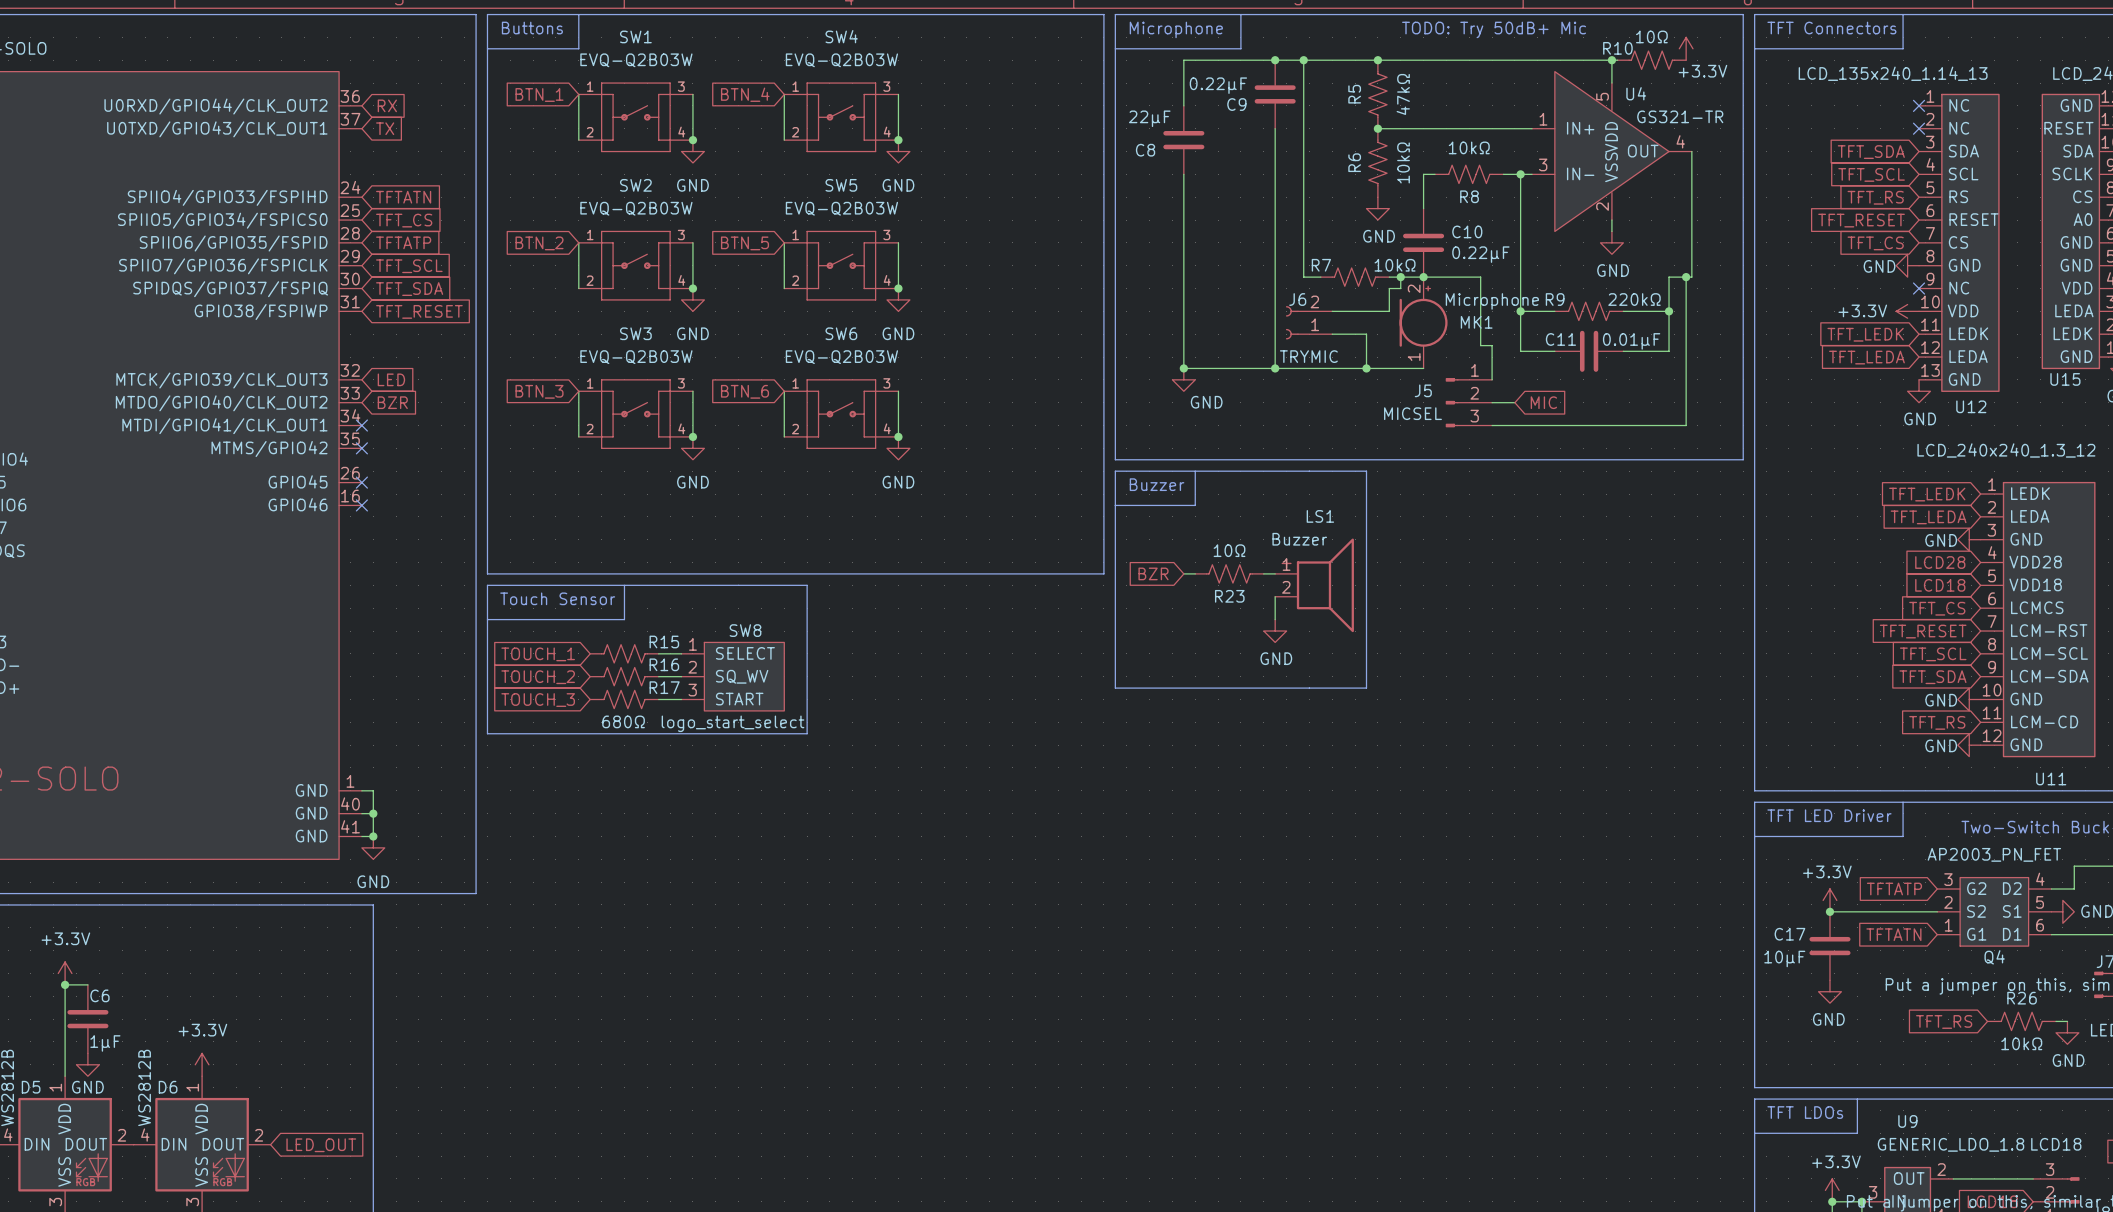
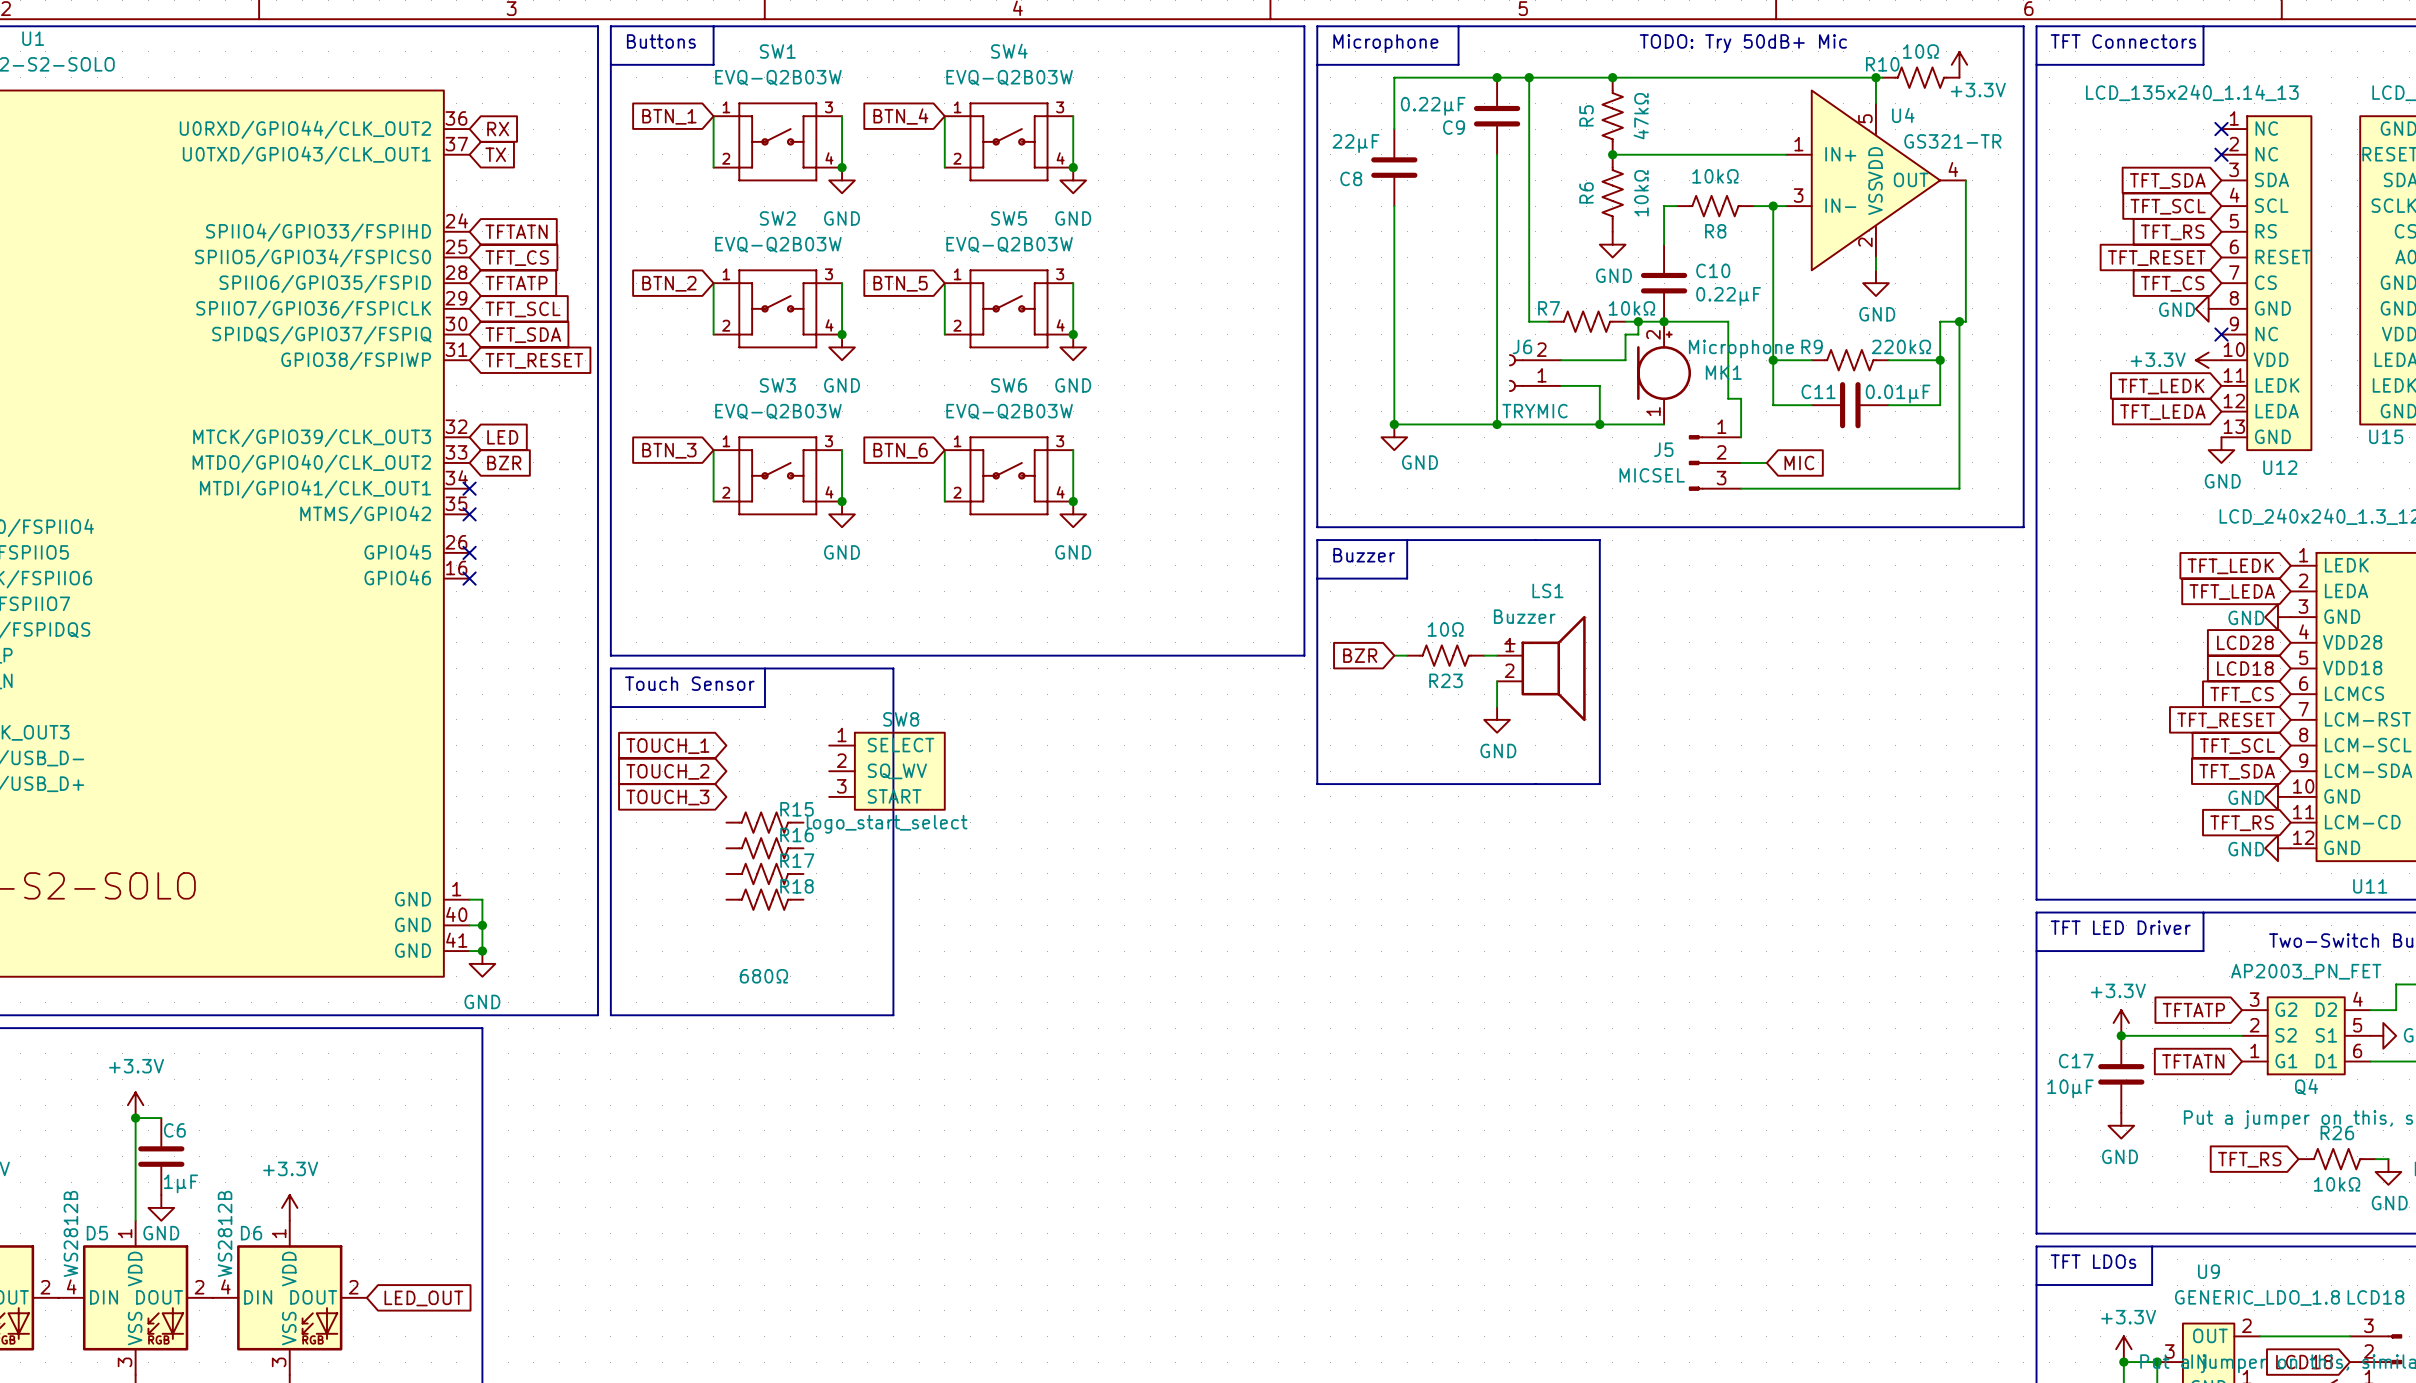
line: (738, 585) (807, 585) (807, 733) (487, 733) -> (893, 668) (893, 1015) (610, 1015) (610, 835)
R15 name position: R15 (664, 641) -> R15 (796, 809)
R15 position: (624, 653) -> (764, 822)
wire: (658, 653) (681, 653) -> none
R16 name position: R16 (664, 664) -> R16 (796, 834)
R16 position: (624, 676) -> (764, 848)
wire: (658, 676) (681, 676) -> none
R17 name position: R17 (664, 687) -> R17 (797, 860)
R17 position: (624, 699) -> (764, 873)
wire: (658, 699) (681, 699) -> none
R15 value position: 680Ω (623, 721) -> 680Ω (763, 976)
R18: none -> (764, 899)

